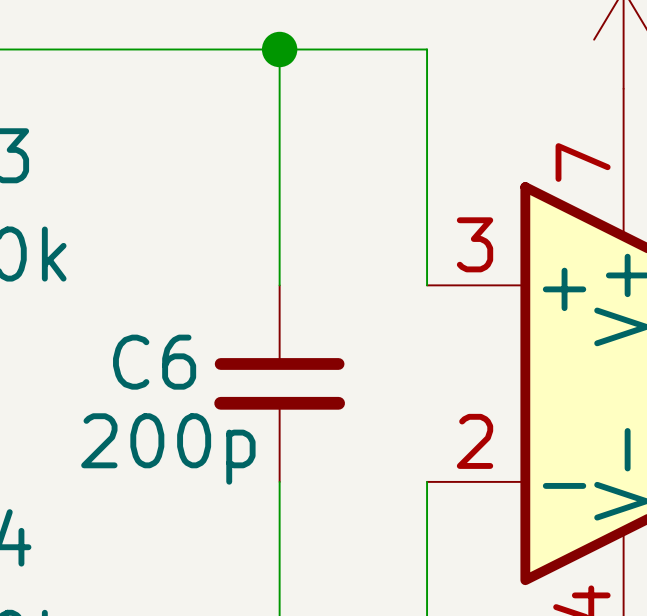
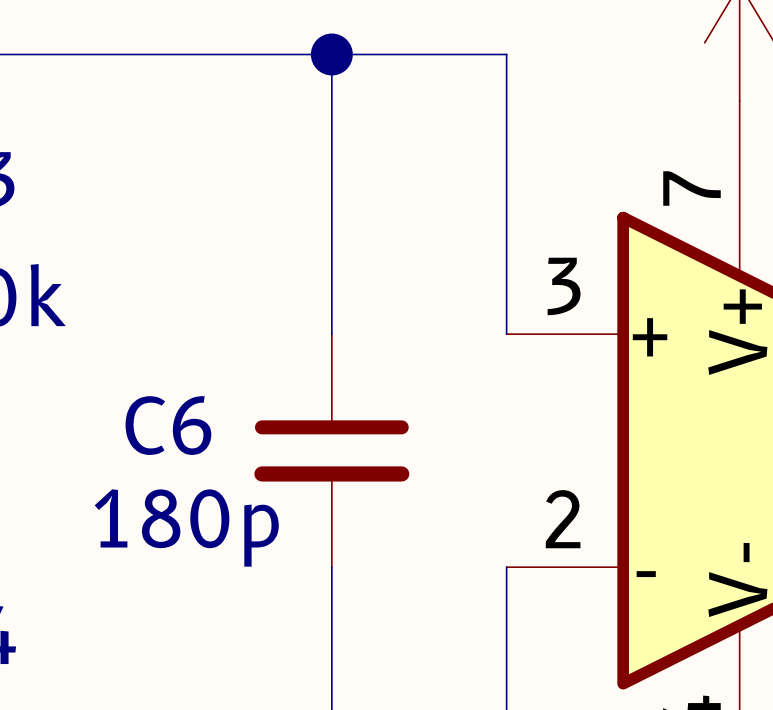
C6 value: 200p (168, 448) -> 180p (186, 527)

